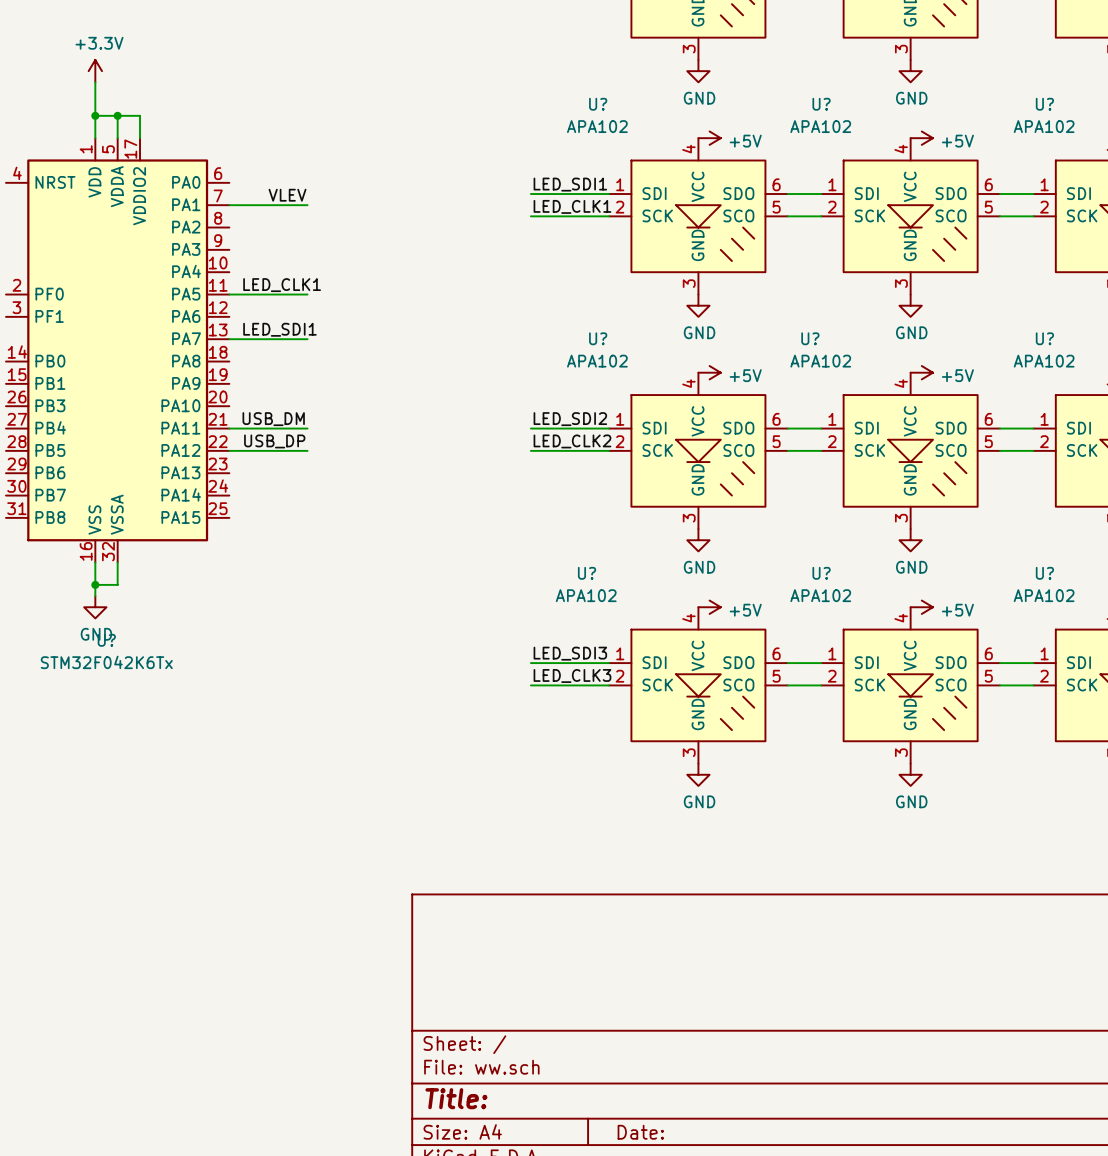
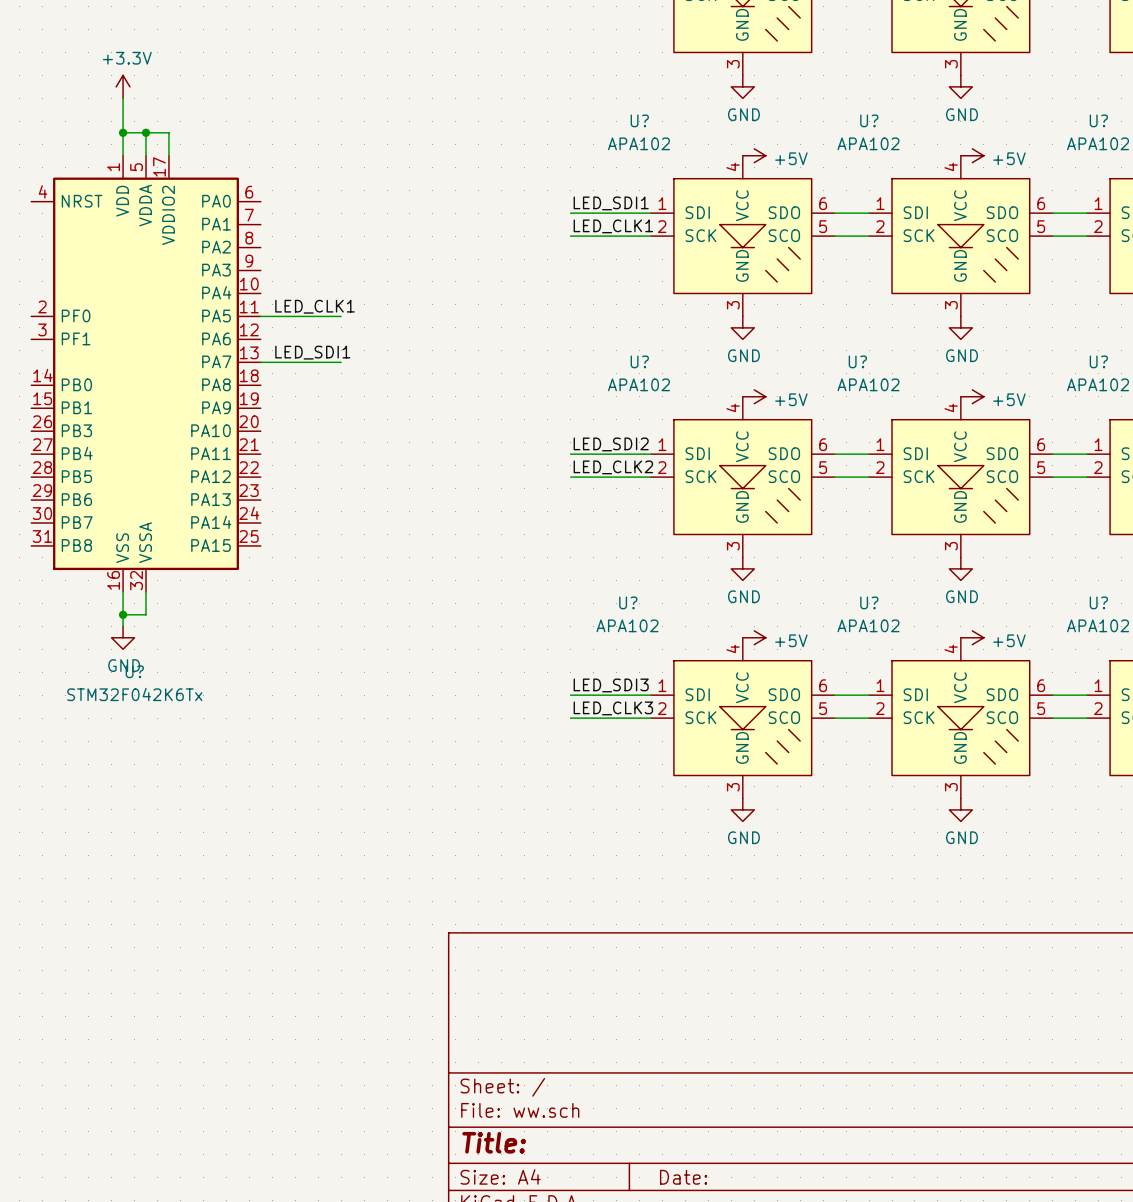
label: VLEV (287, 195) -> none
wire: (229, 205) (307, 205) -> none
label: USB_DM (273, 419) -> none
wire: (229, 428) (307, 428) -> none
label: USB_DP (274, 441) -> none
wire: (229, 450) (307, 450) -> none

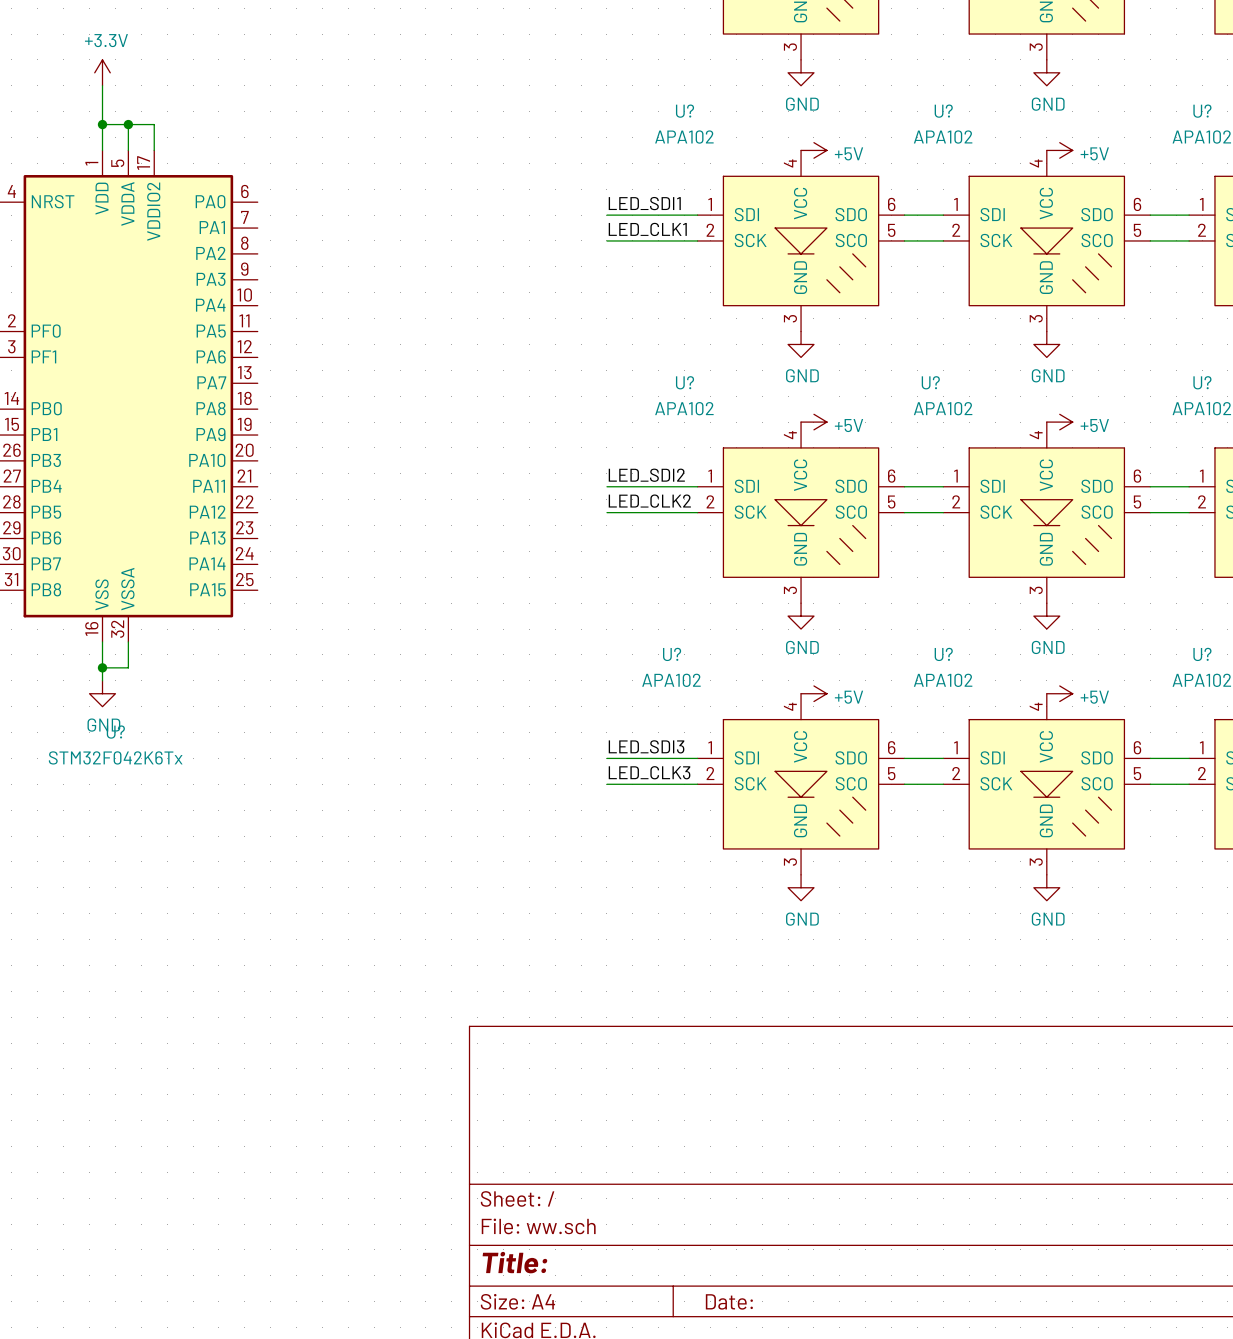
label: LED_CLK1 (314, 306) -> none
wire: (260, 316) (341, 316) -> none
label: LED_SDI1 (312, 352) -> none
wire: (260, 362) (341, 362) -> none

